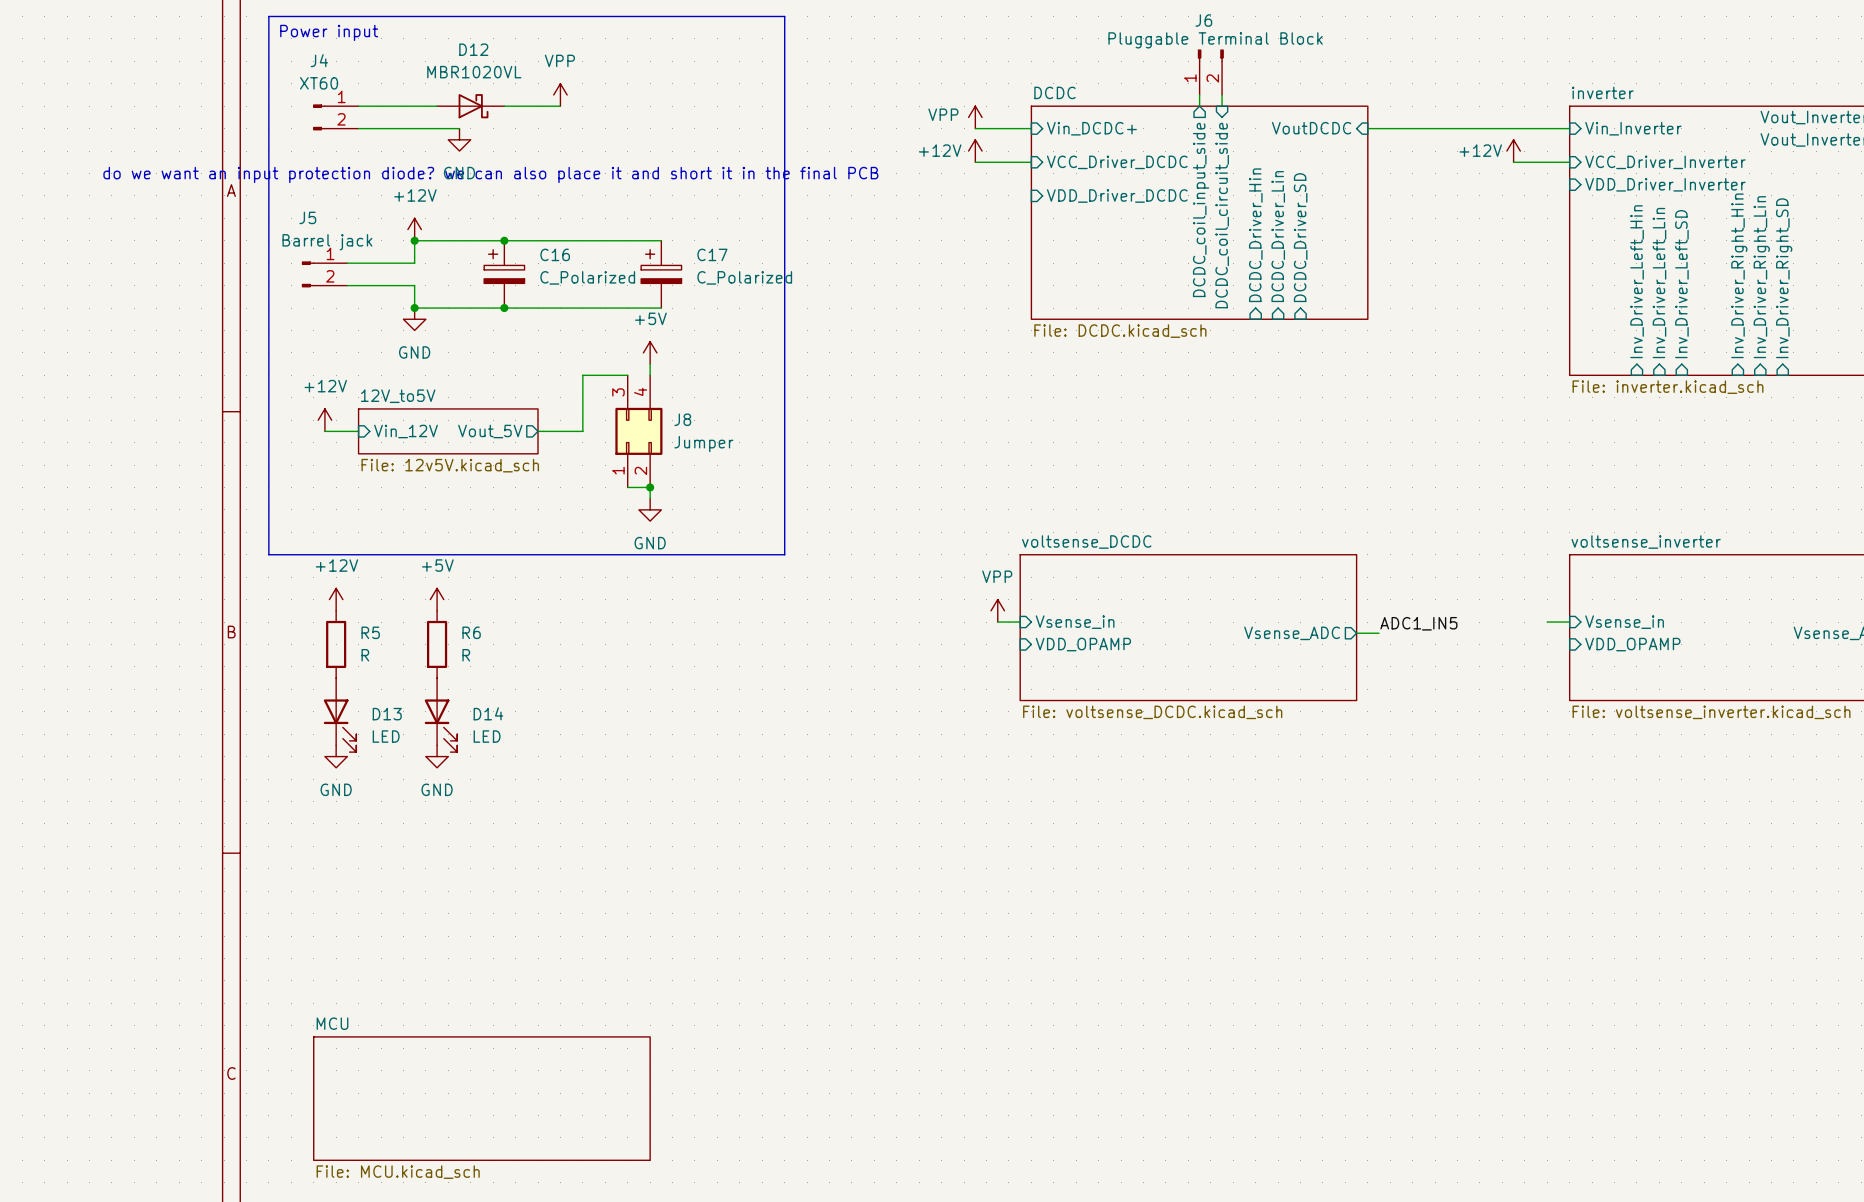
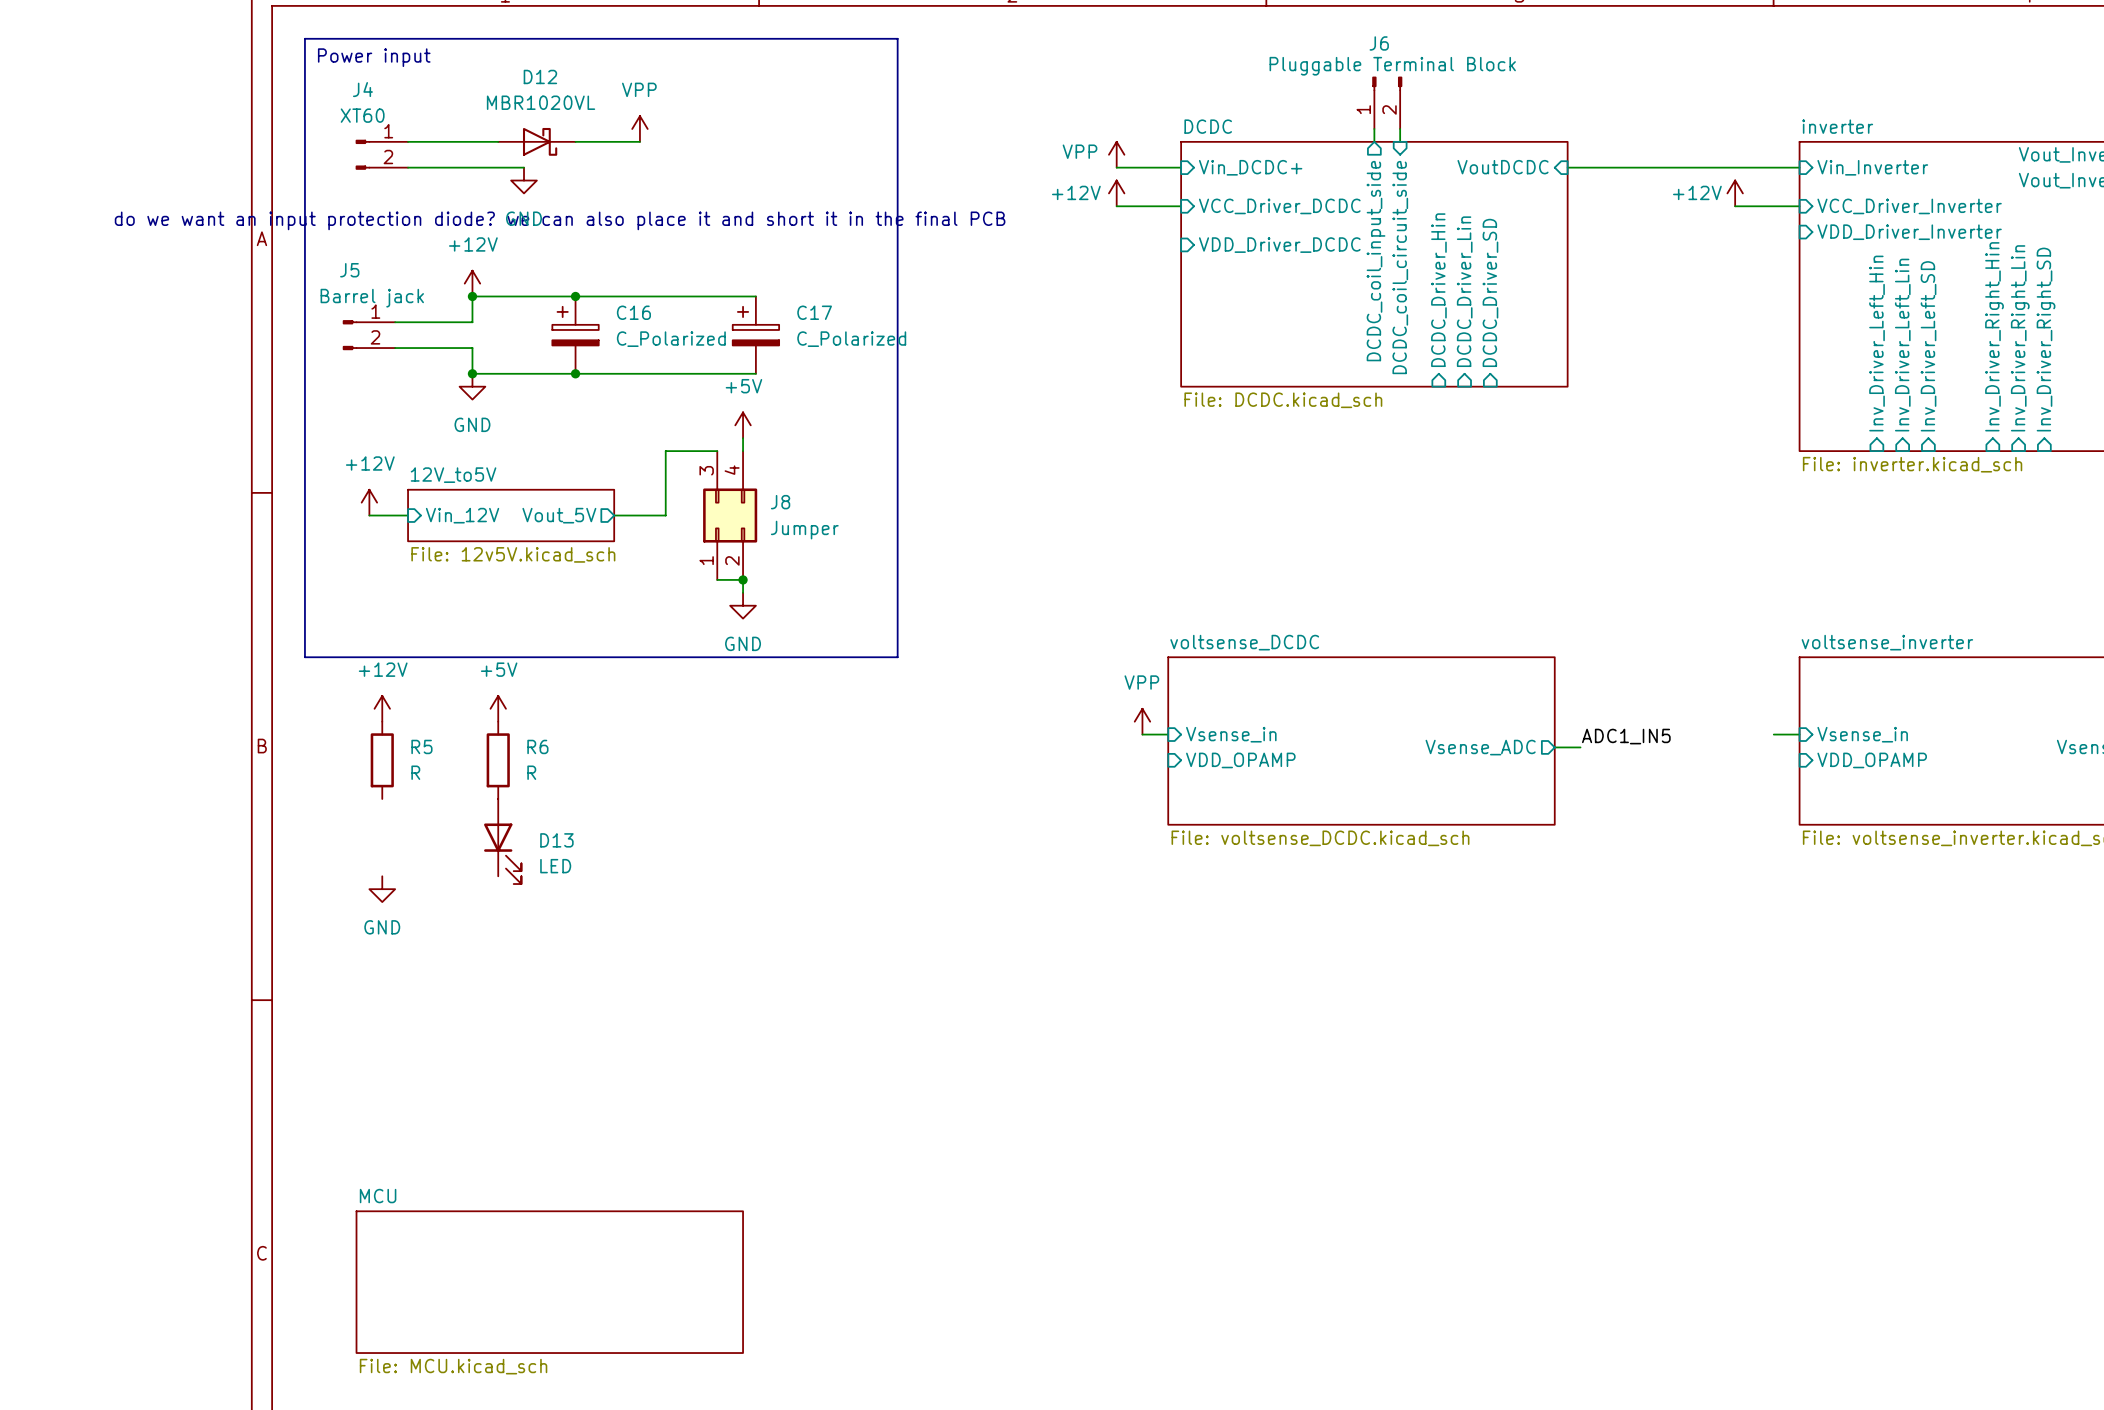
D14 name: D14 (488, 713) -> D13 (556, 840)
D13: LED (340, 715) -> none
power symbol: GND (437, 756) -> none

